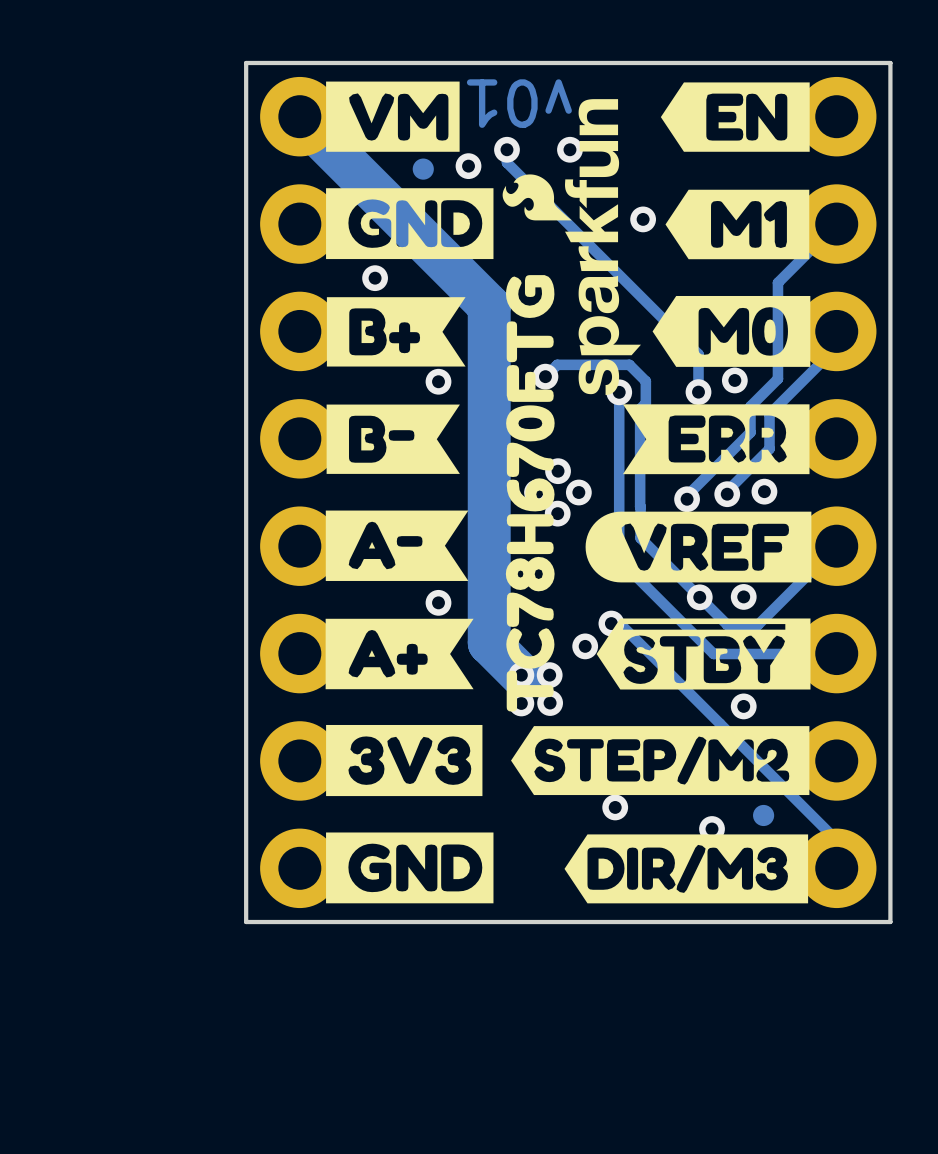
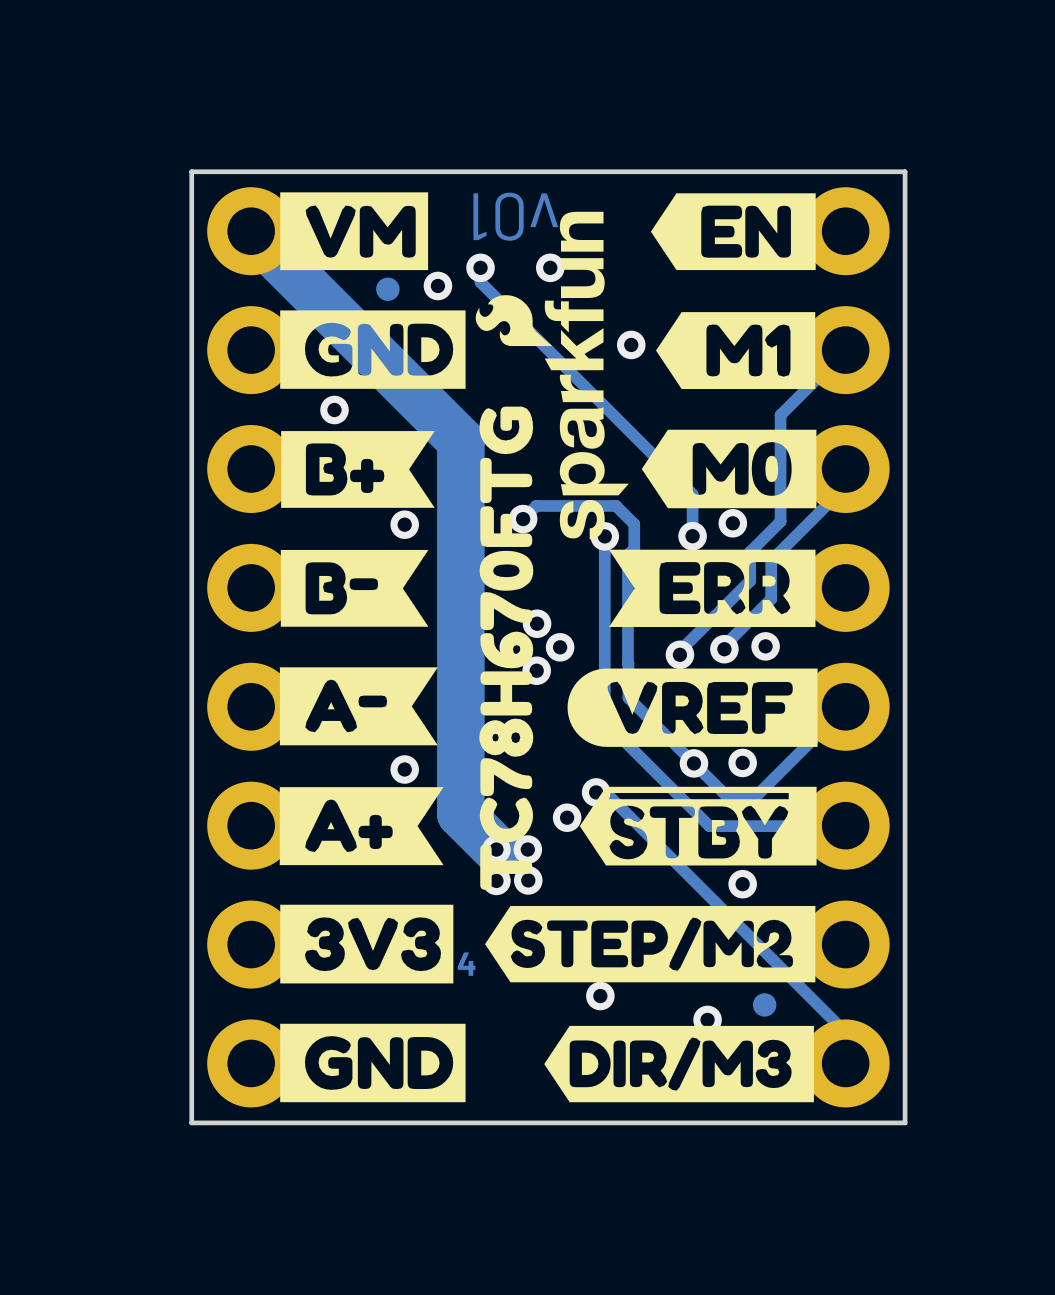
text: none -> 4 (466, 964)

